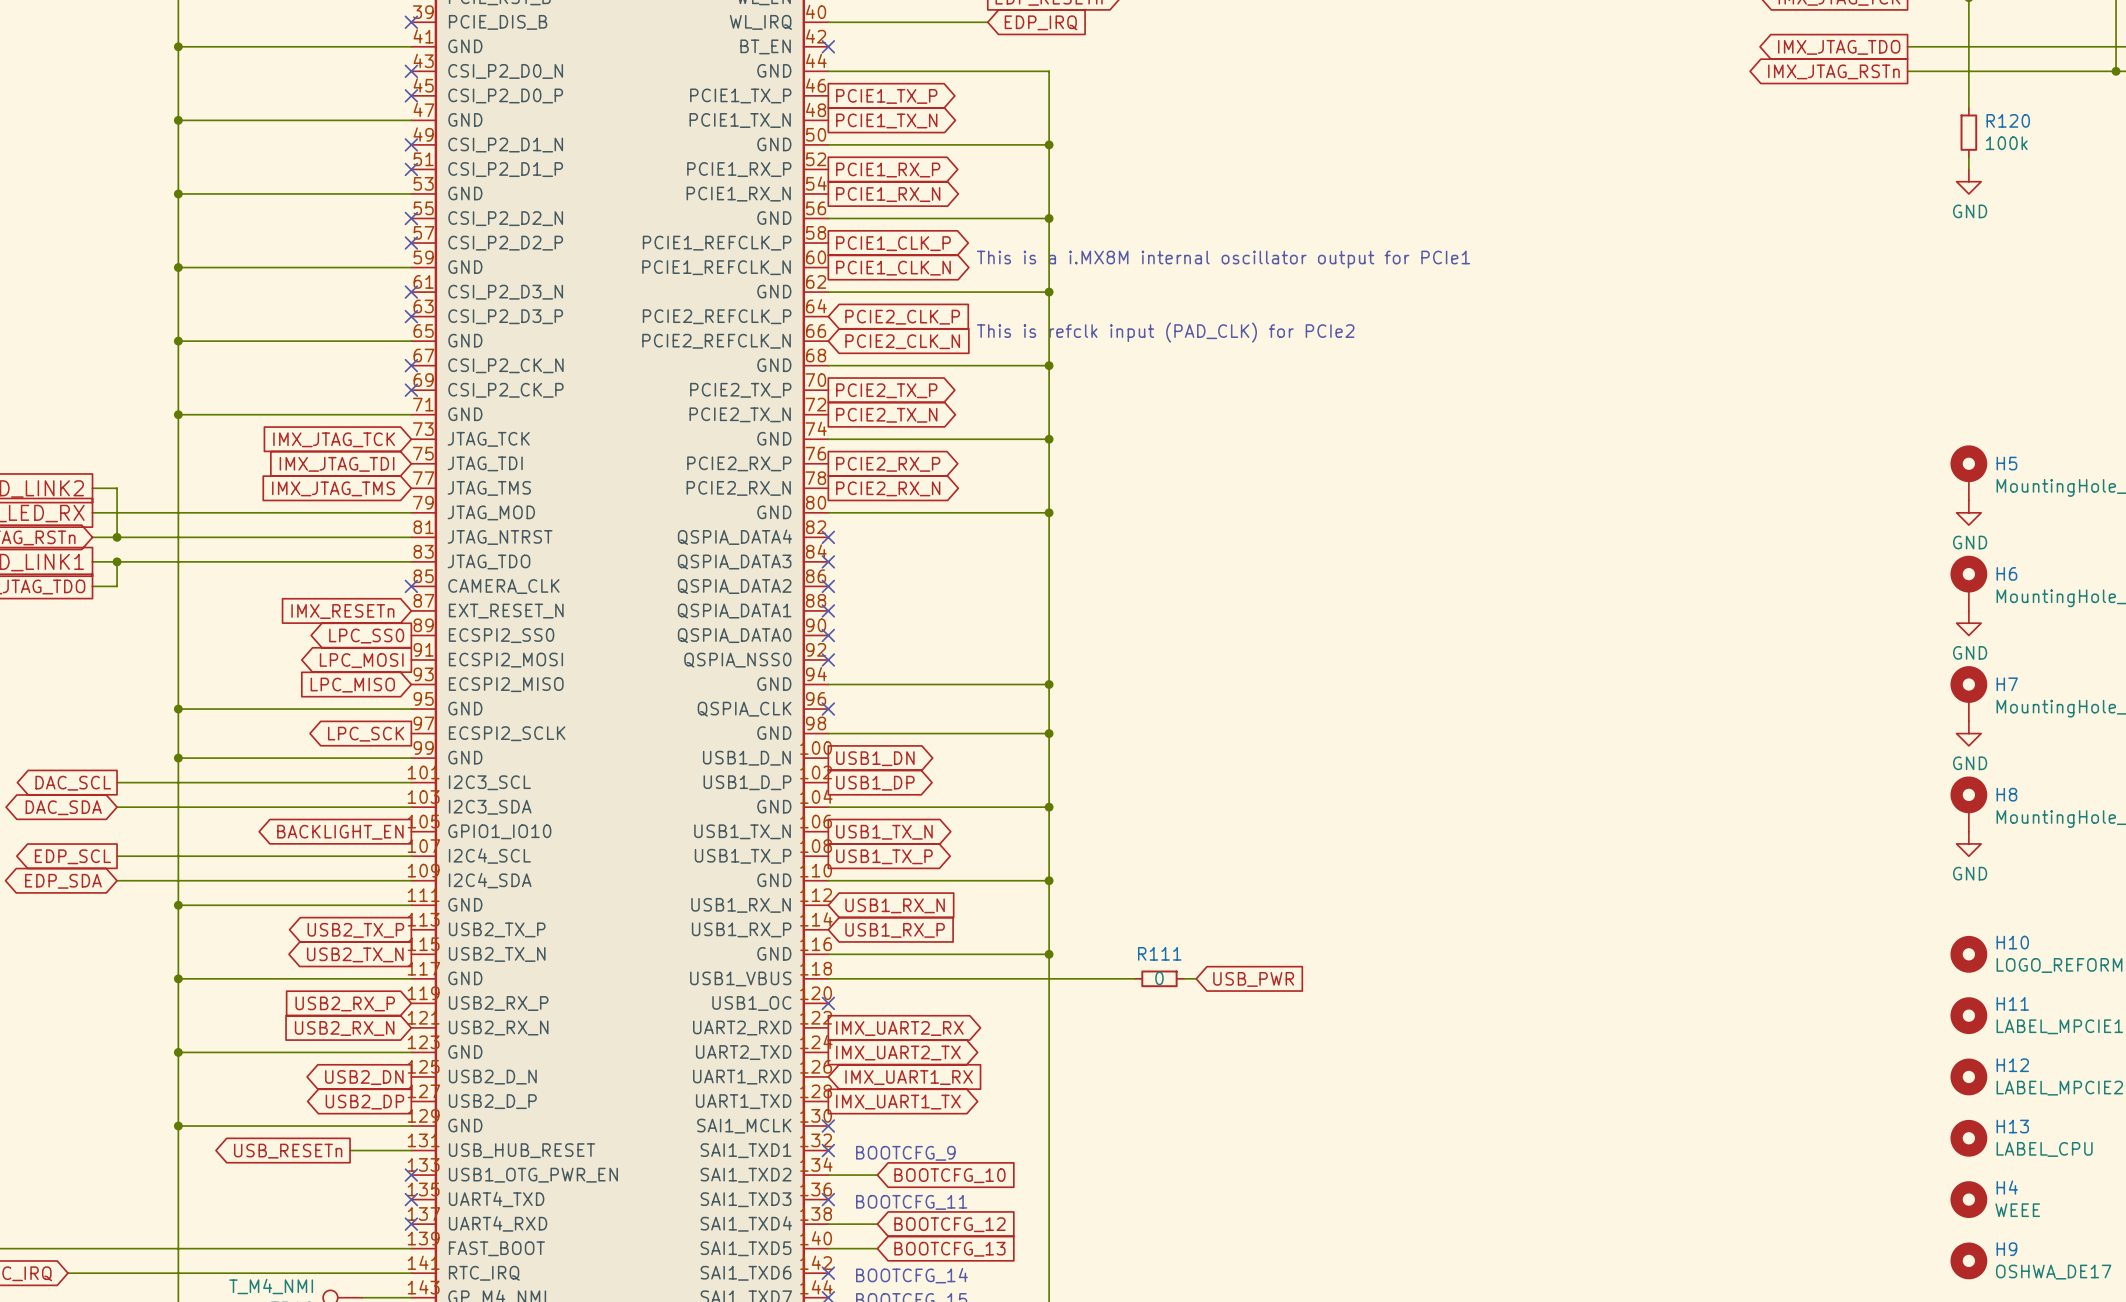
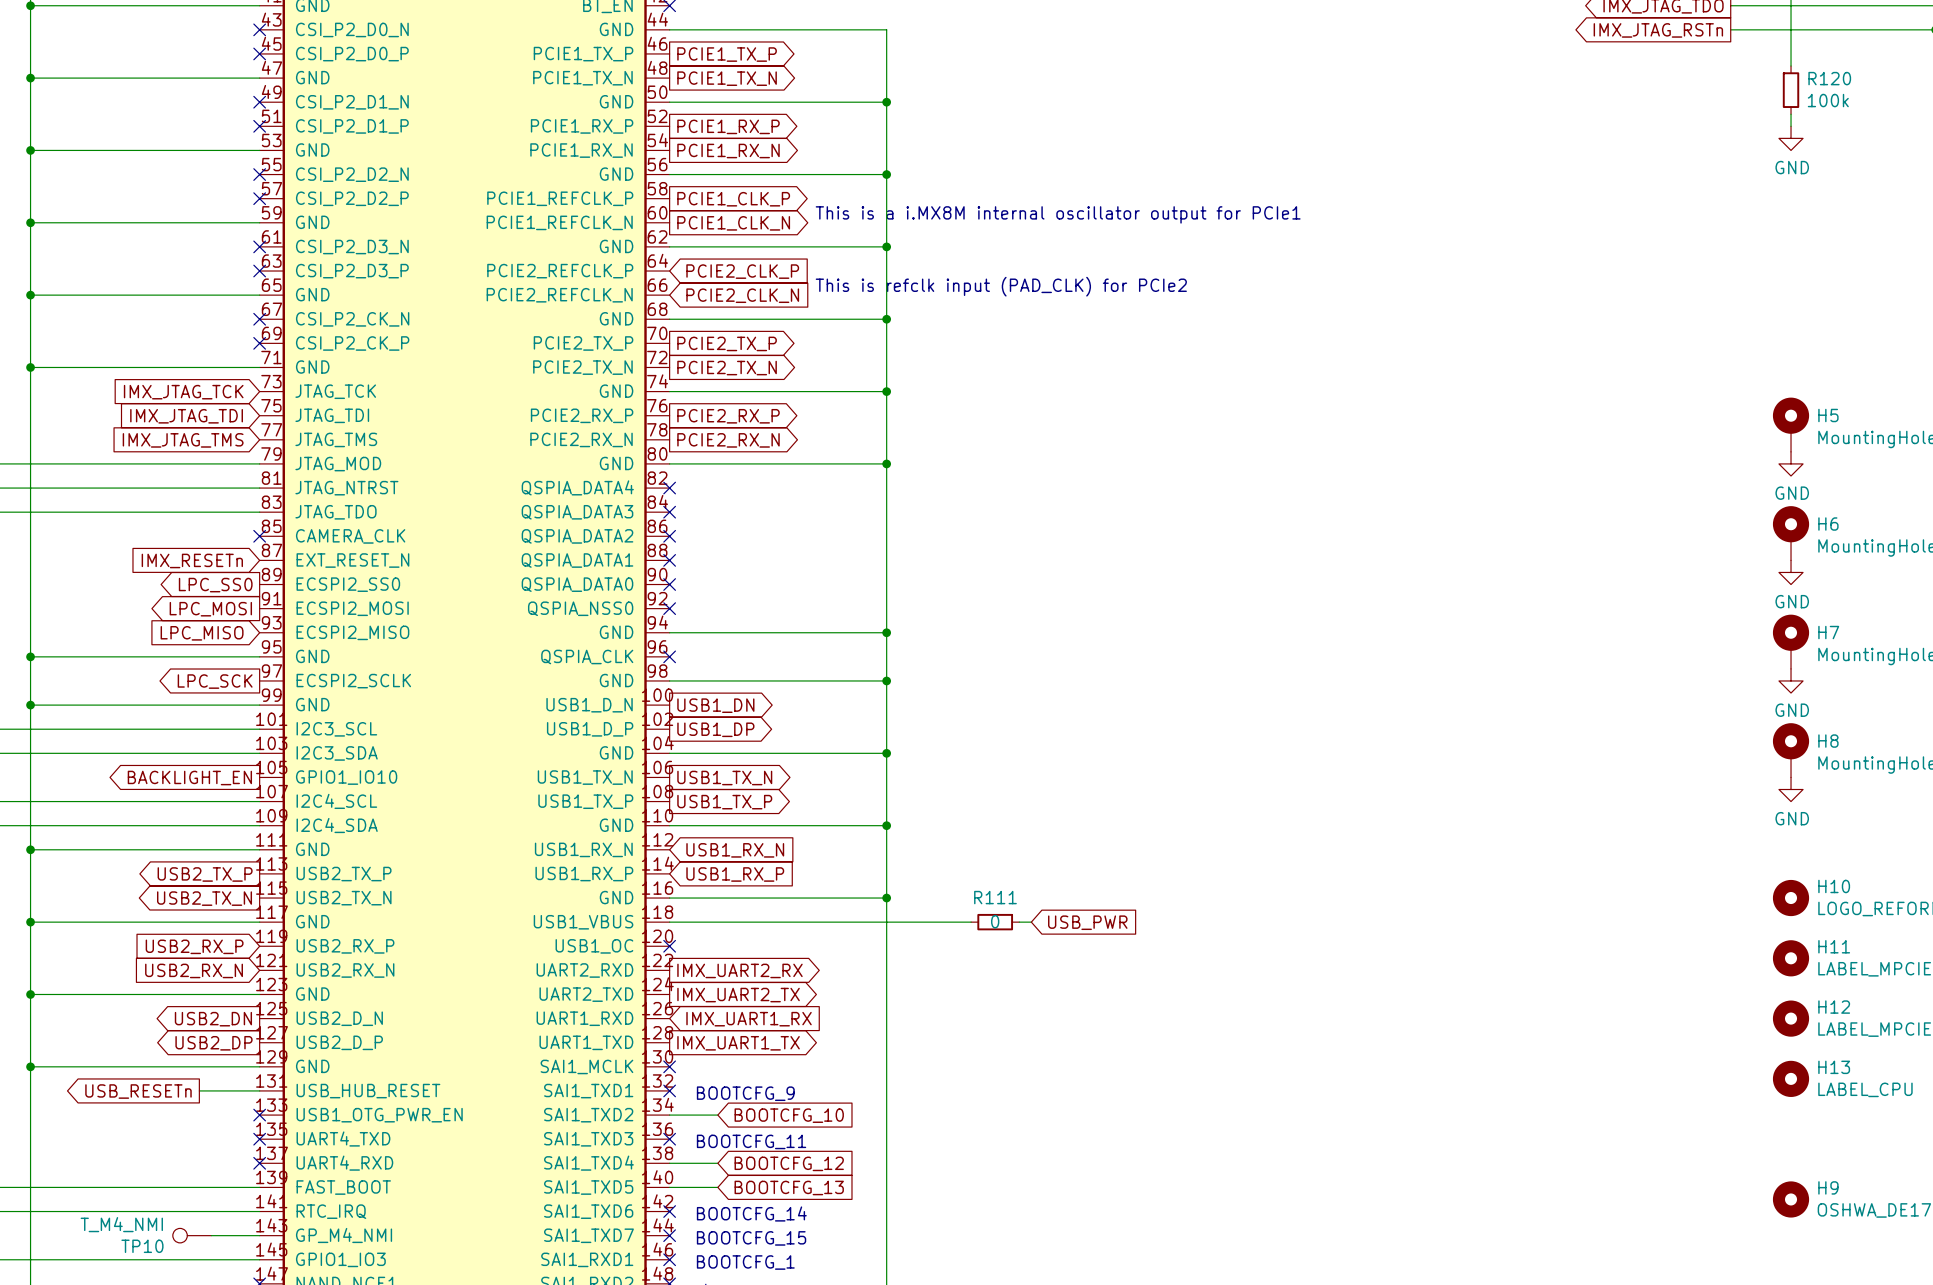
H4: WEEE (1968, 1199) -> none

